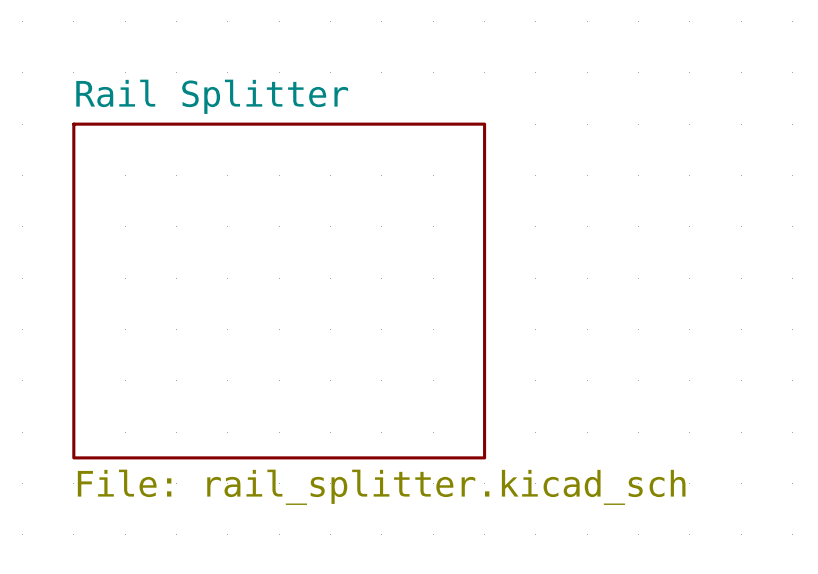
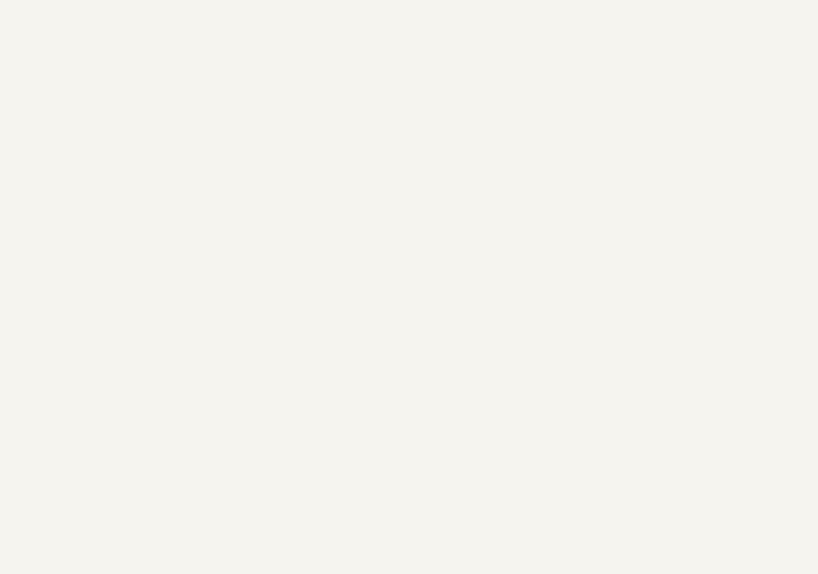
sheet Rail Splitter: File: rail_splitter.kicad_sch (279, 291) -> none

